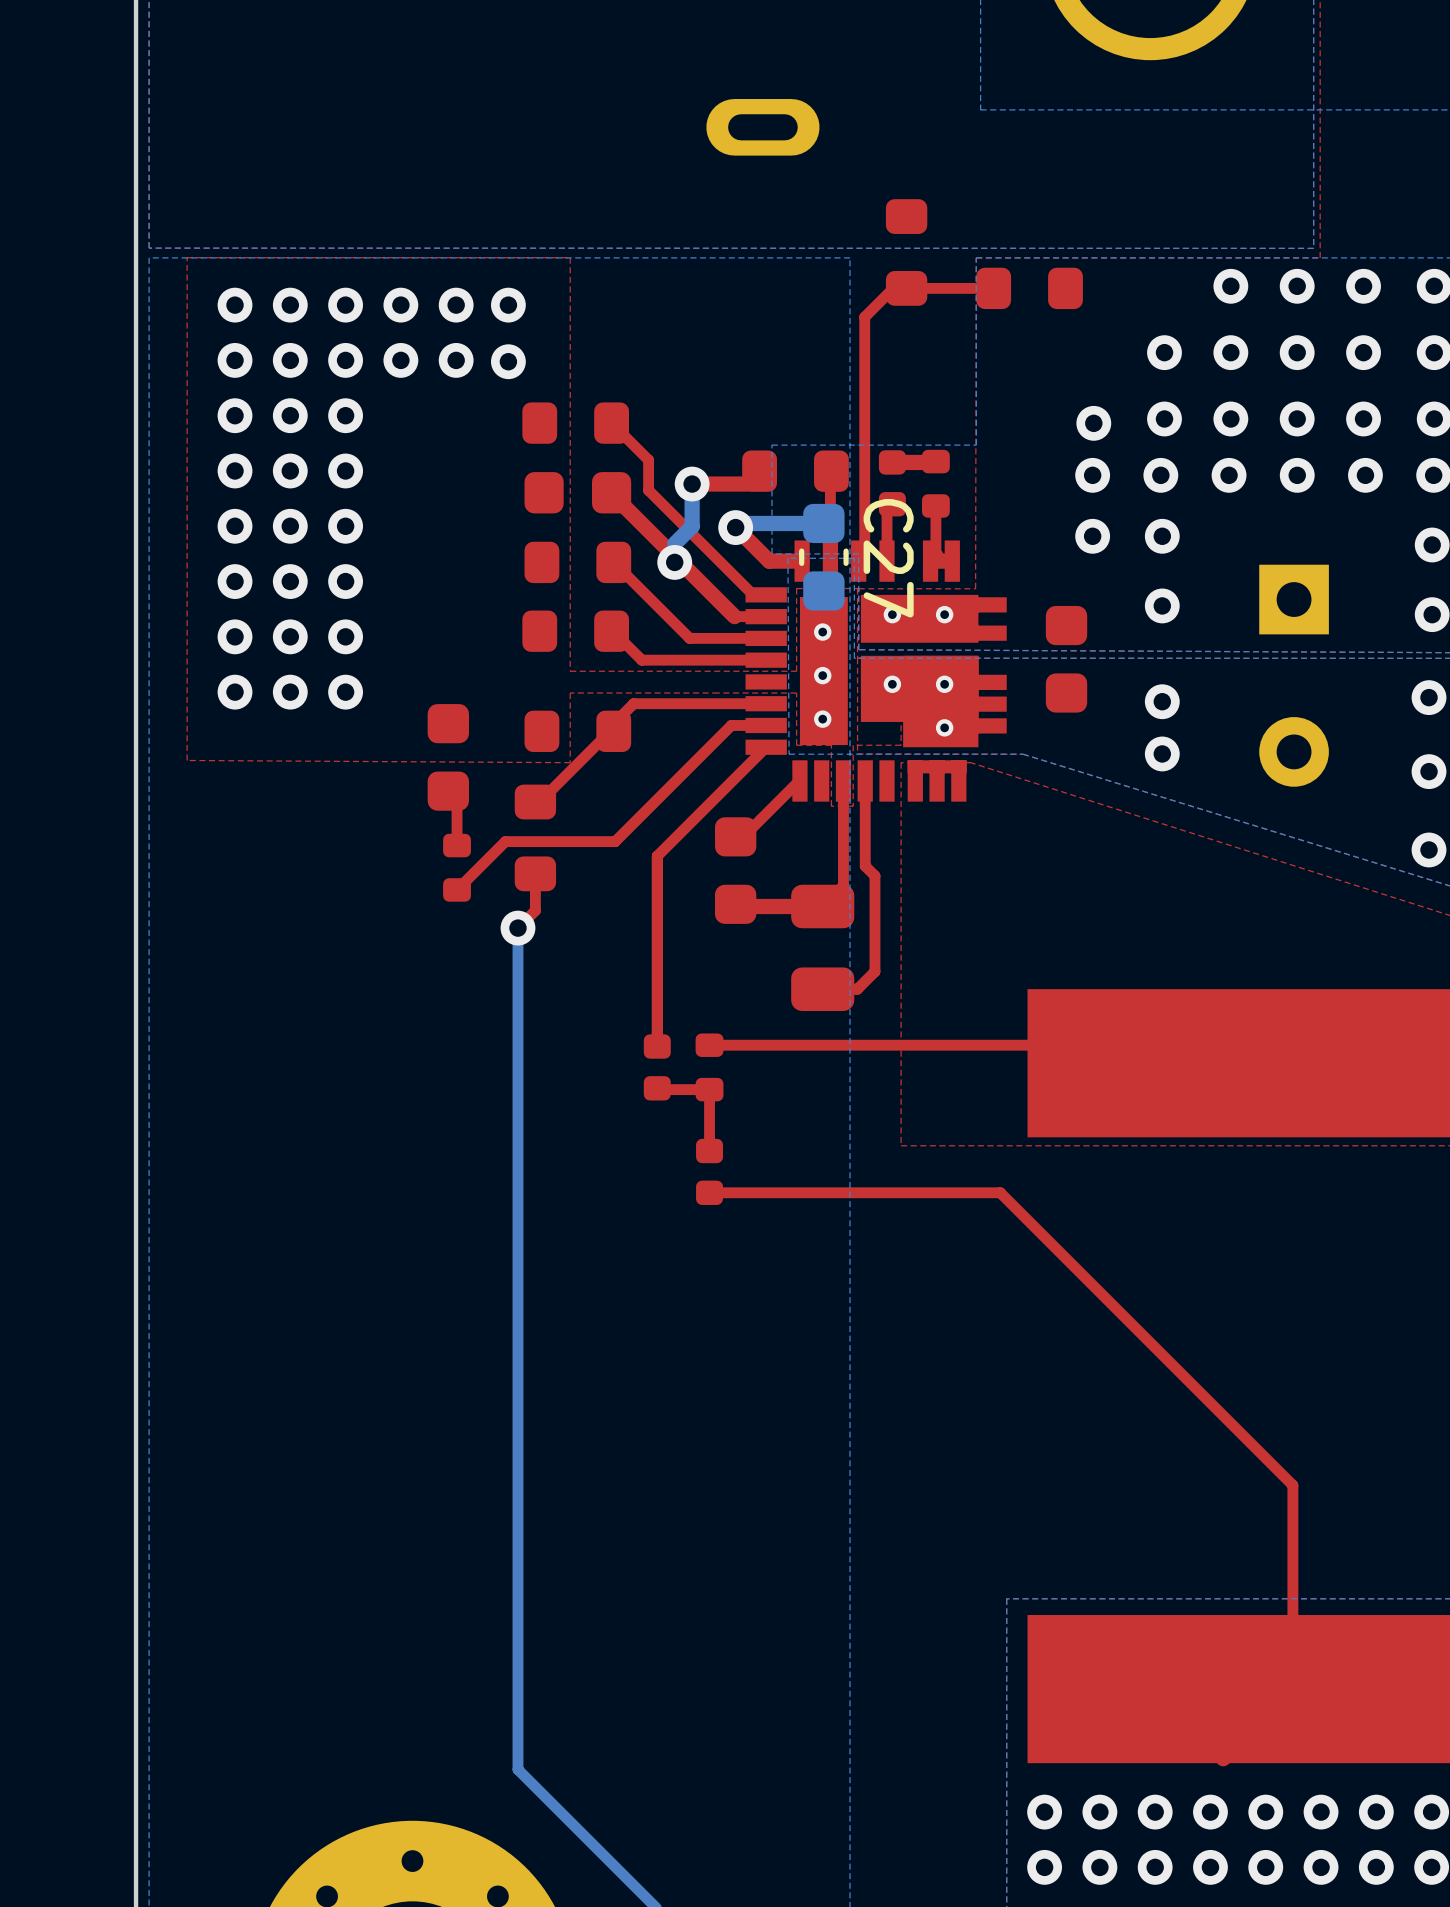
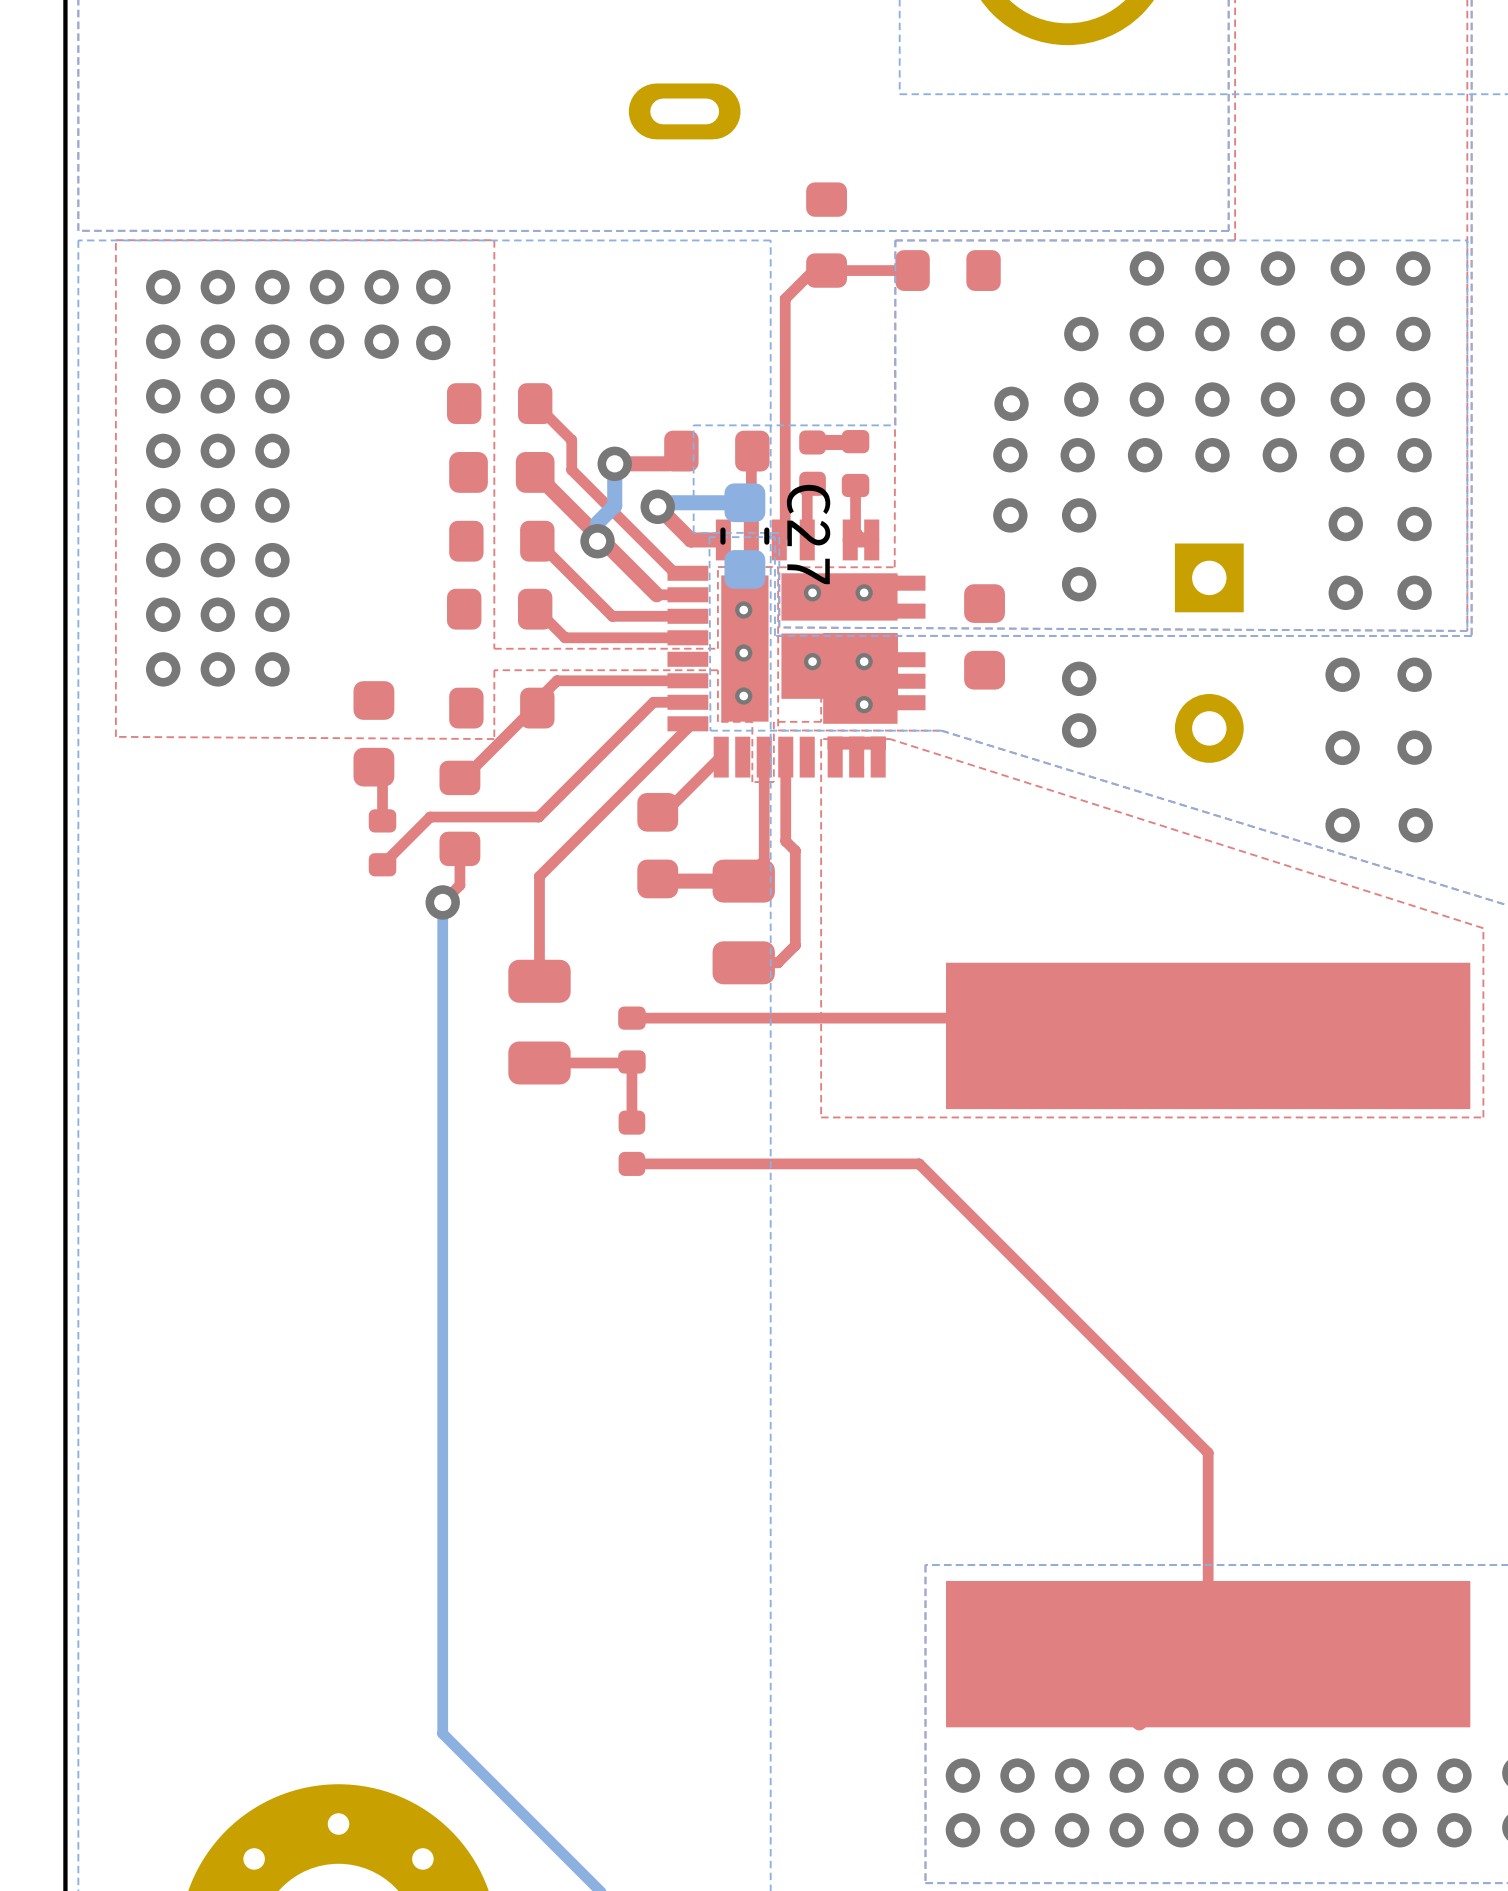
top track: (766, 747) (657, 856) (657, 1046) -> (687, 723) (687, 727) (539, 876) (539, 981)
part: none -> (539, 1022)
part: (657, 1067) -> none
top track: (657, 1088) (709, 1089) -> (539, 1062) (631, 1061)

